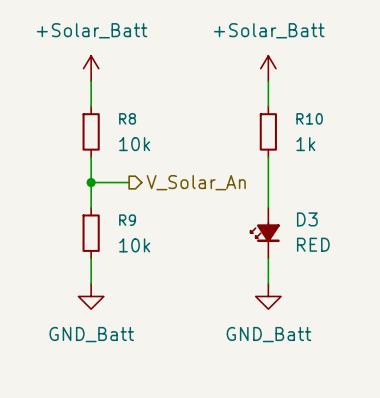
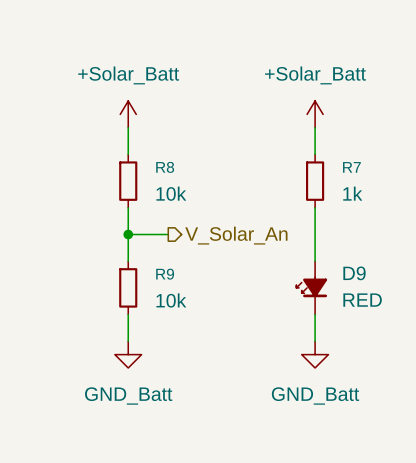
R10 name: R10 (309, 118) -> R7 (351, 167)
D3 name: D3 (307, 219) -> D9 (354, 273)

